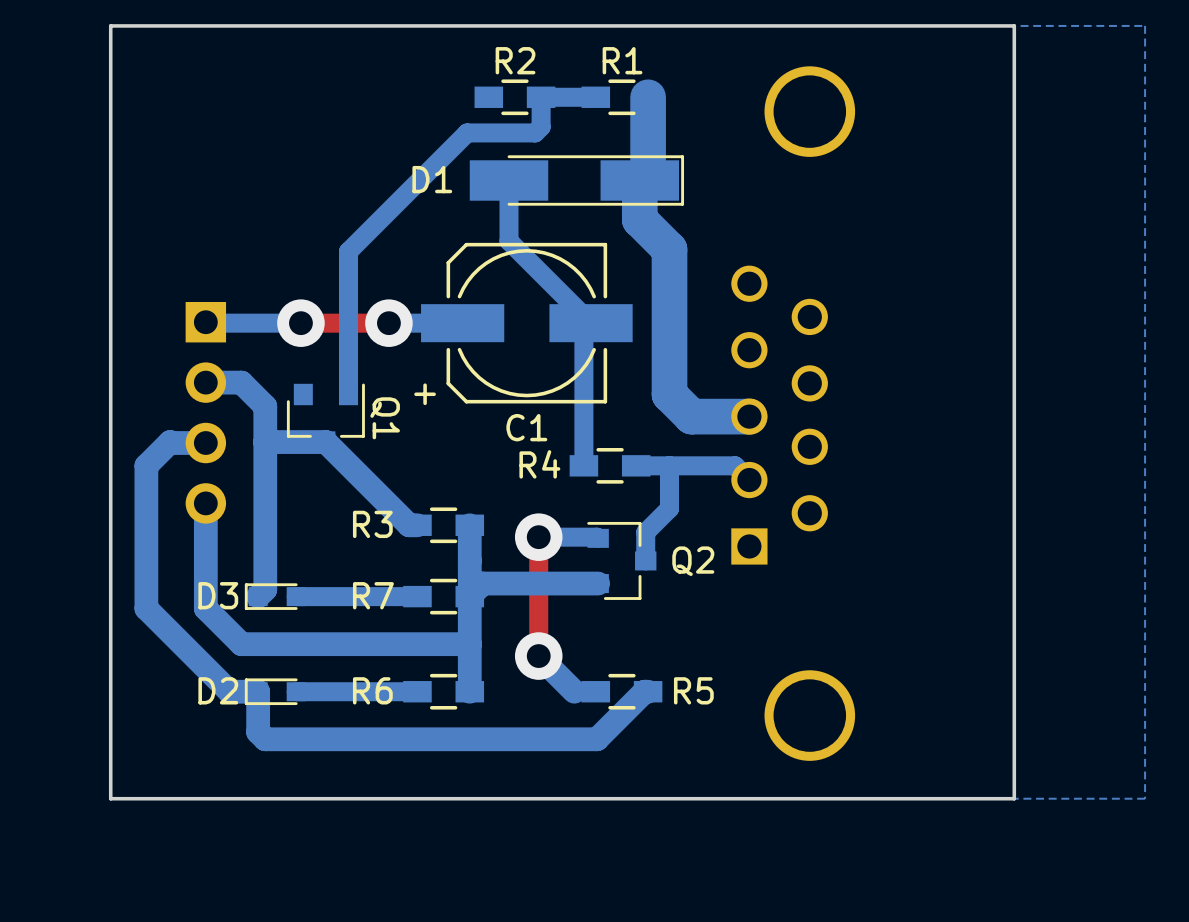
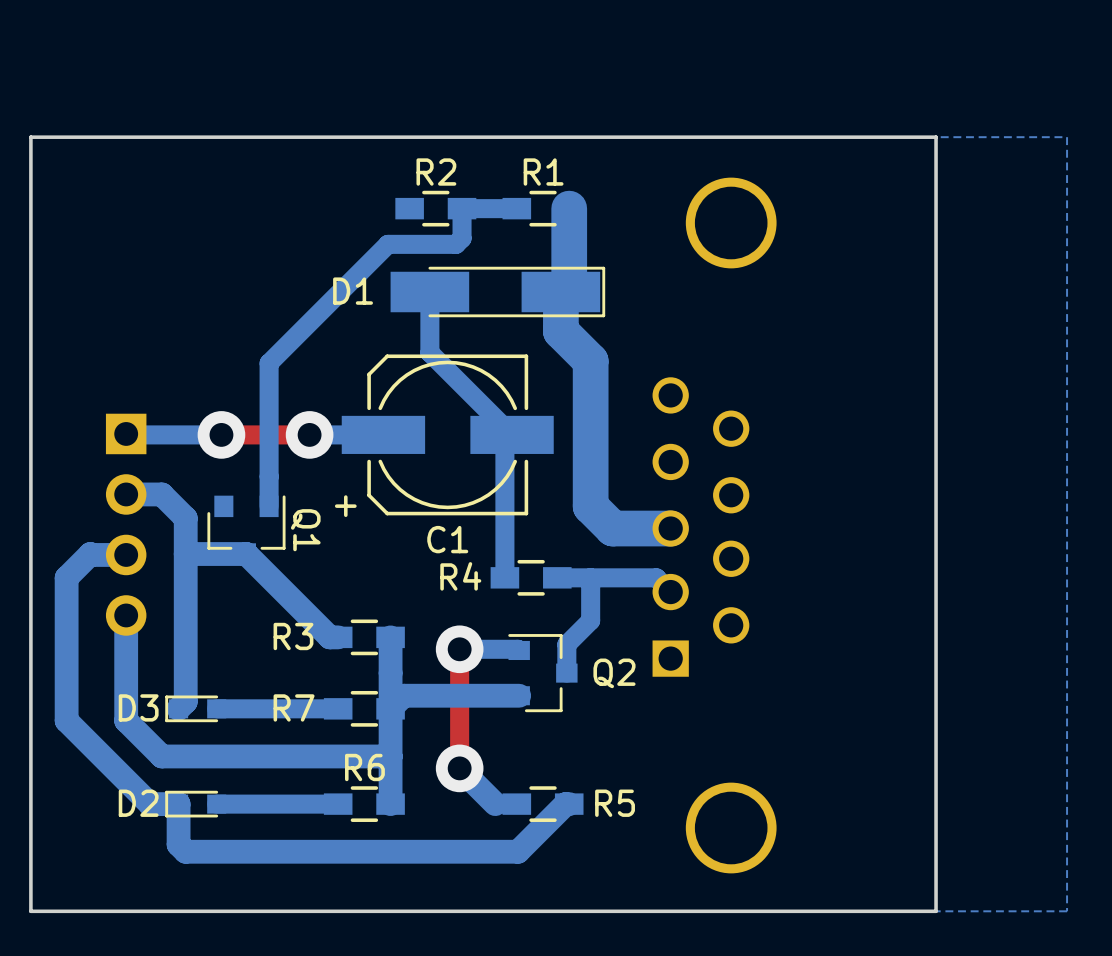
R6 name position: R6 (372, 690) -> R6 (364, 767)

